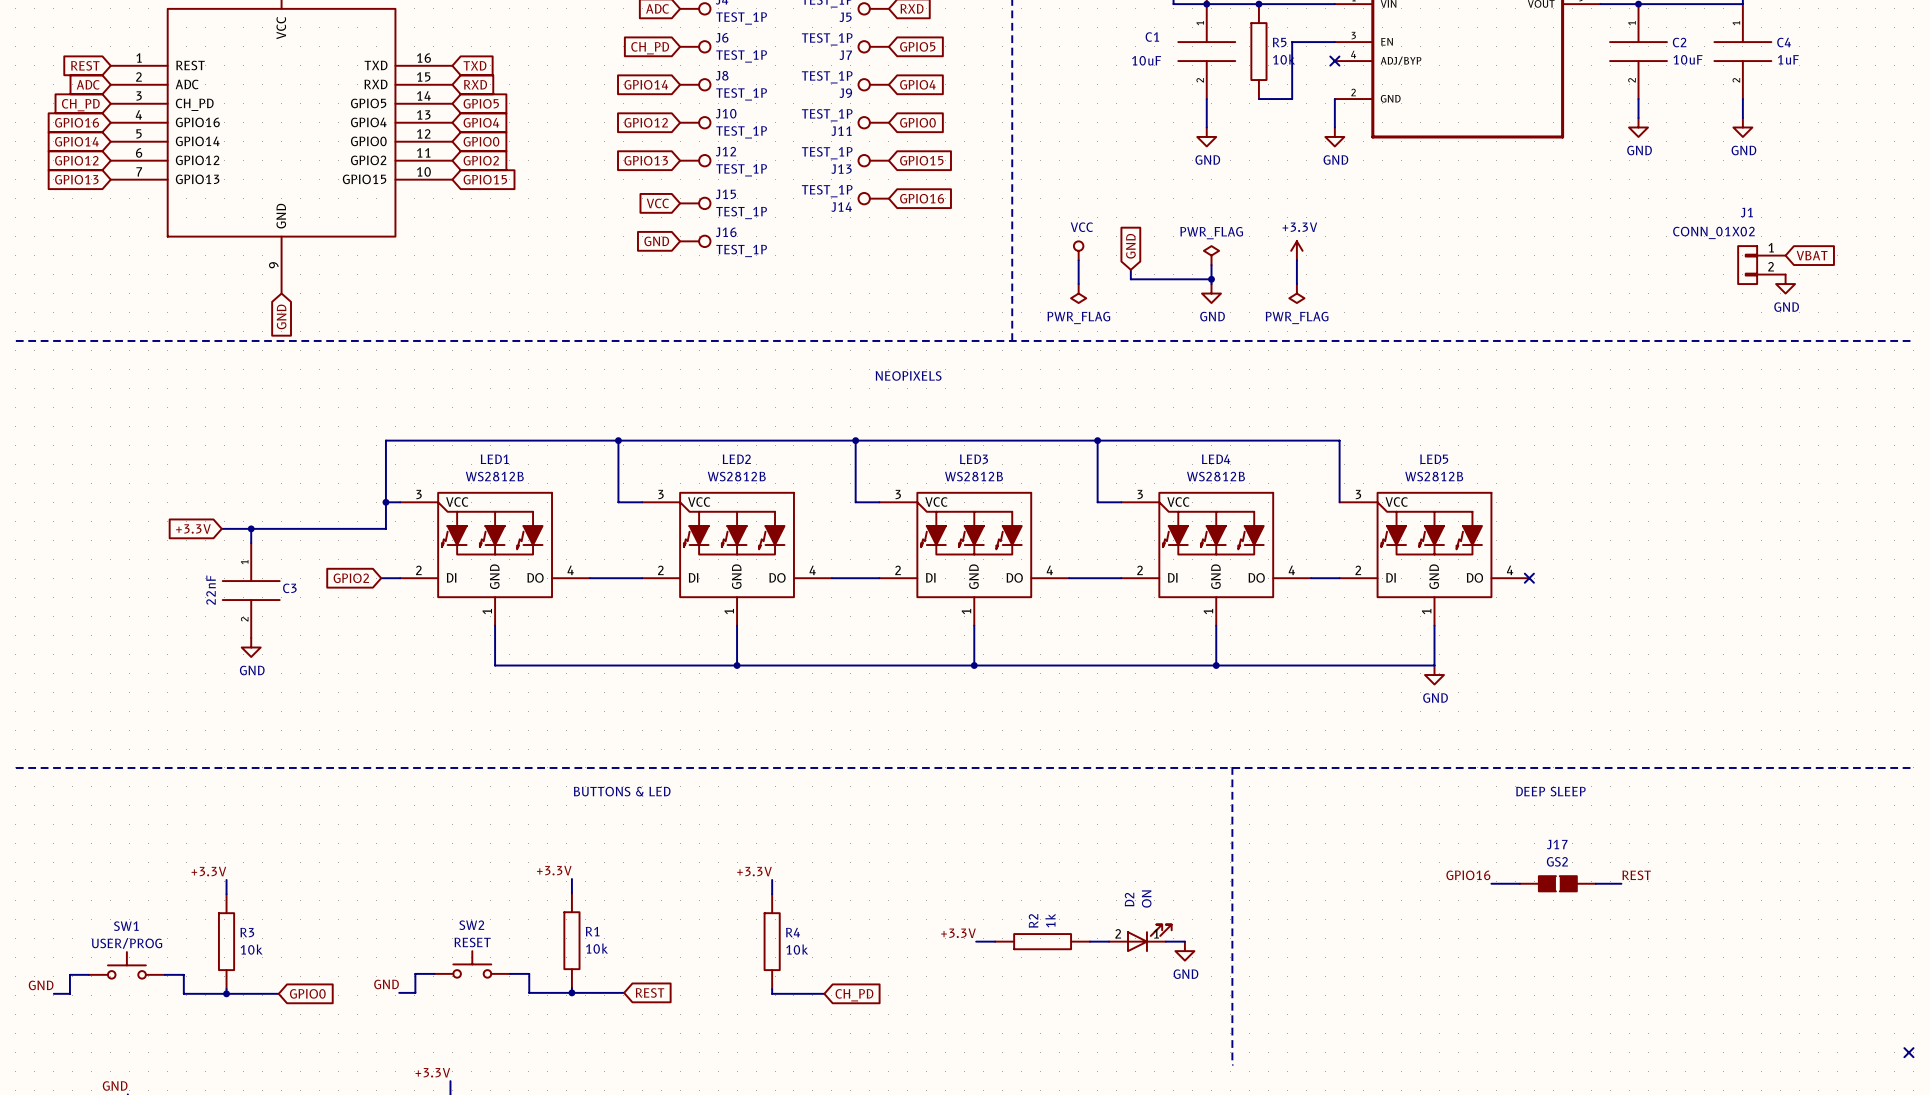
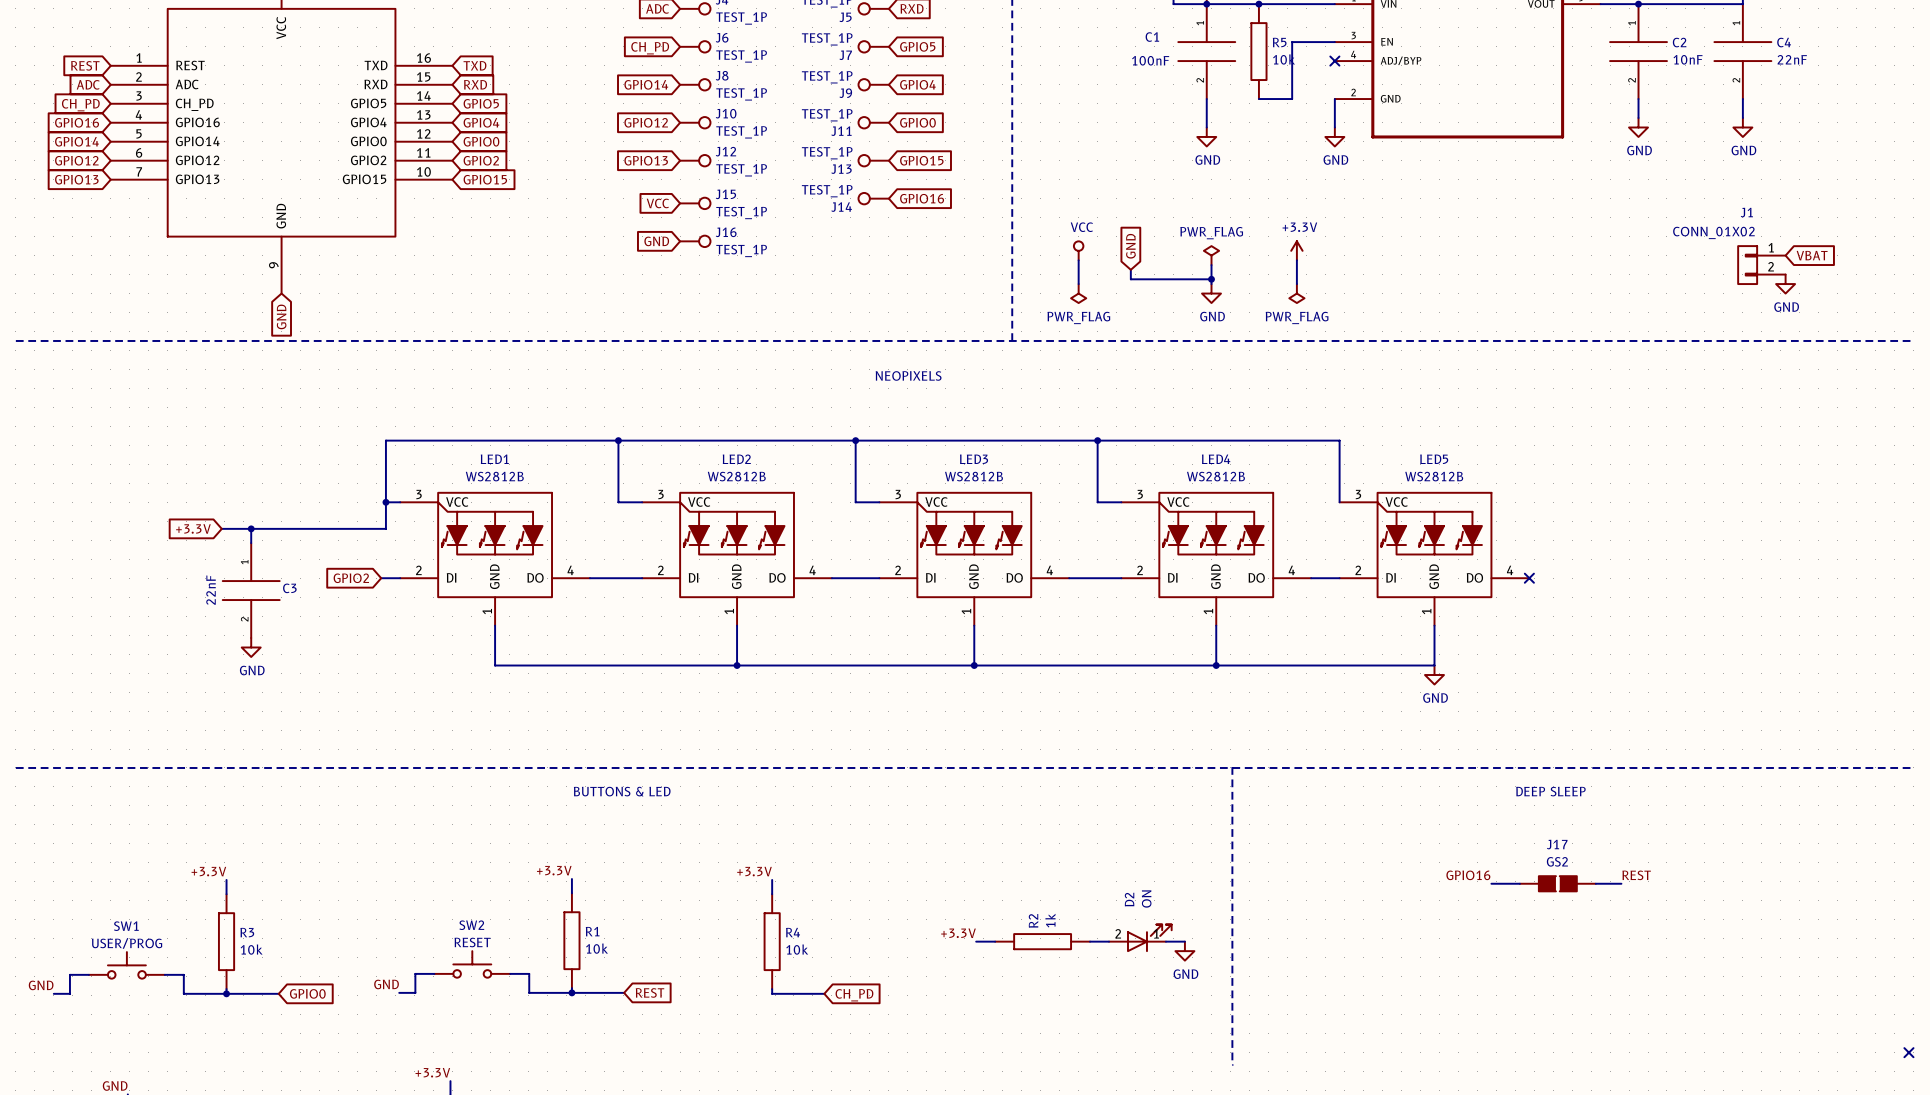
C2 value: 10uF (1688, 59) -> 10nF (1688, 59)
C4 value: 1uF (1788, 59) -> 22nF (1792, 59)
C1 value: 10uF (1146, 60) -> 100nF (1150, 60)

